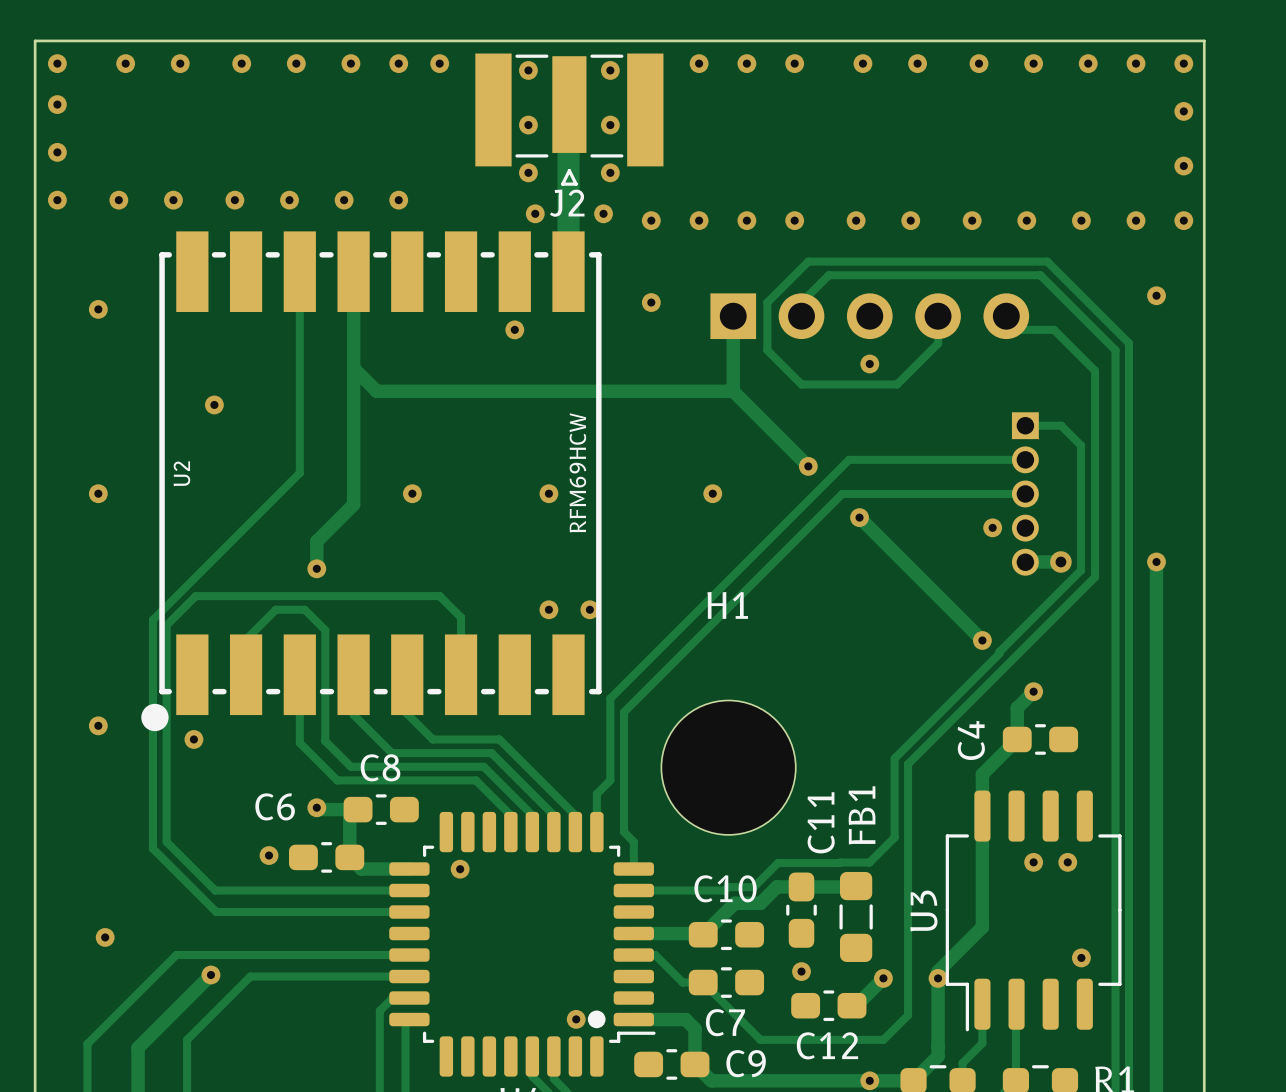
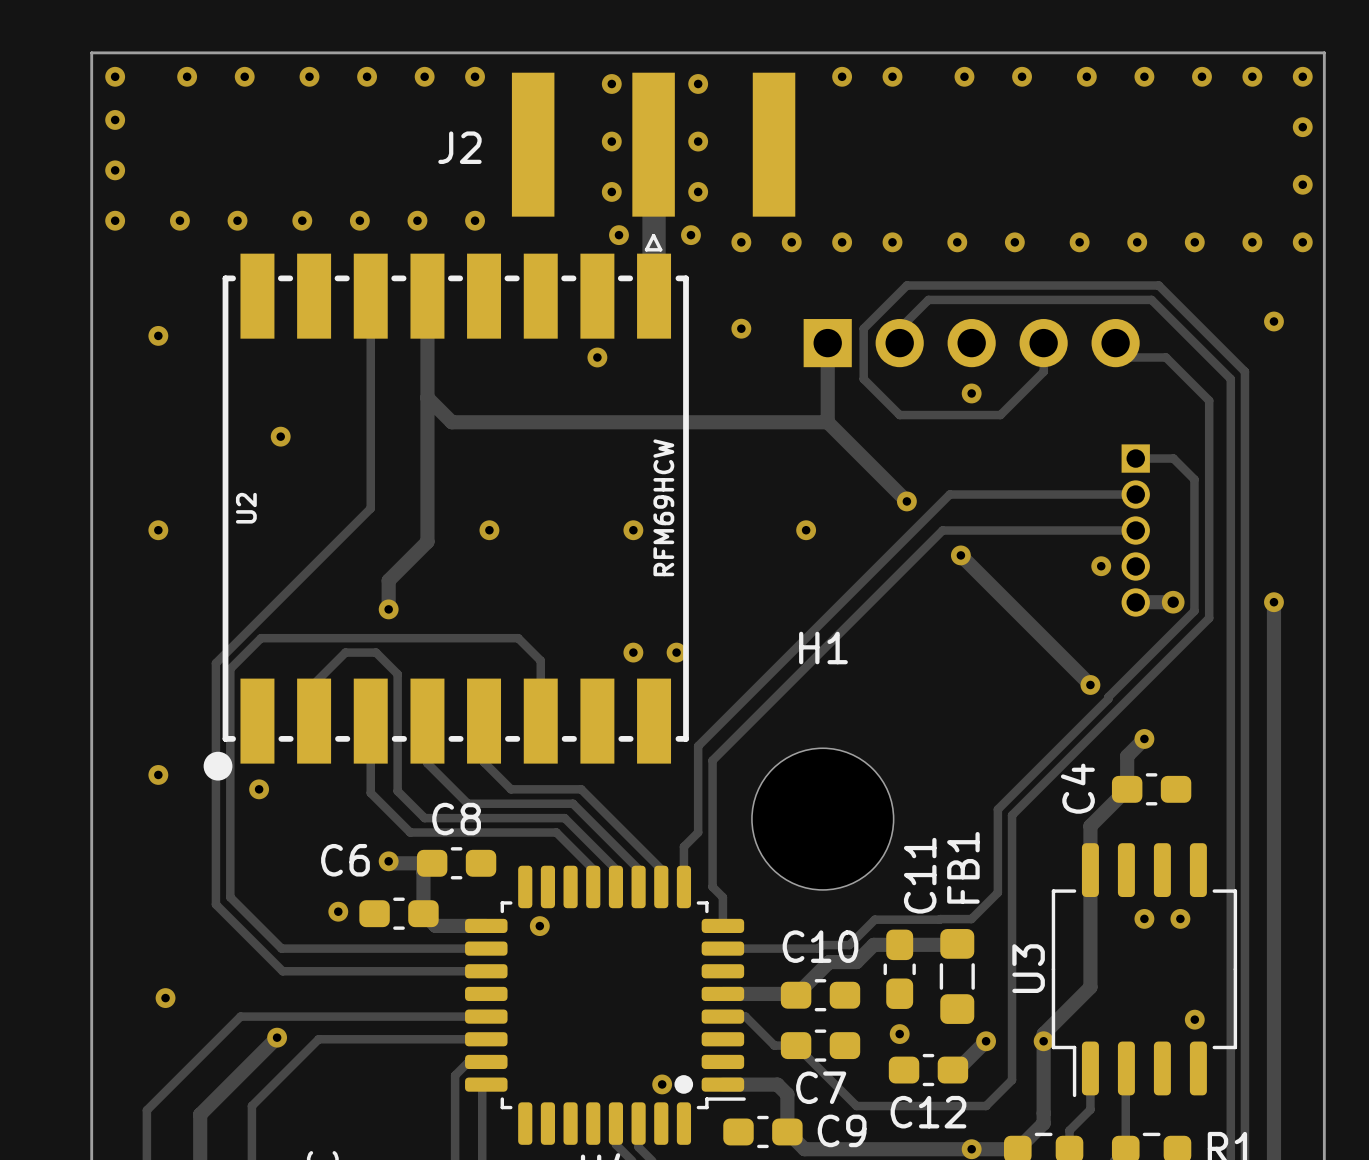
J2 footprint: [475, 53, 664, 186] -> [511, 72, 796, 252]
via: (439, 63) -> none
via: (699, 63) -> none
J2 name position: J2 (567, 203) -> J2 (459, 147)

